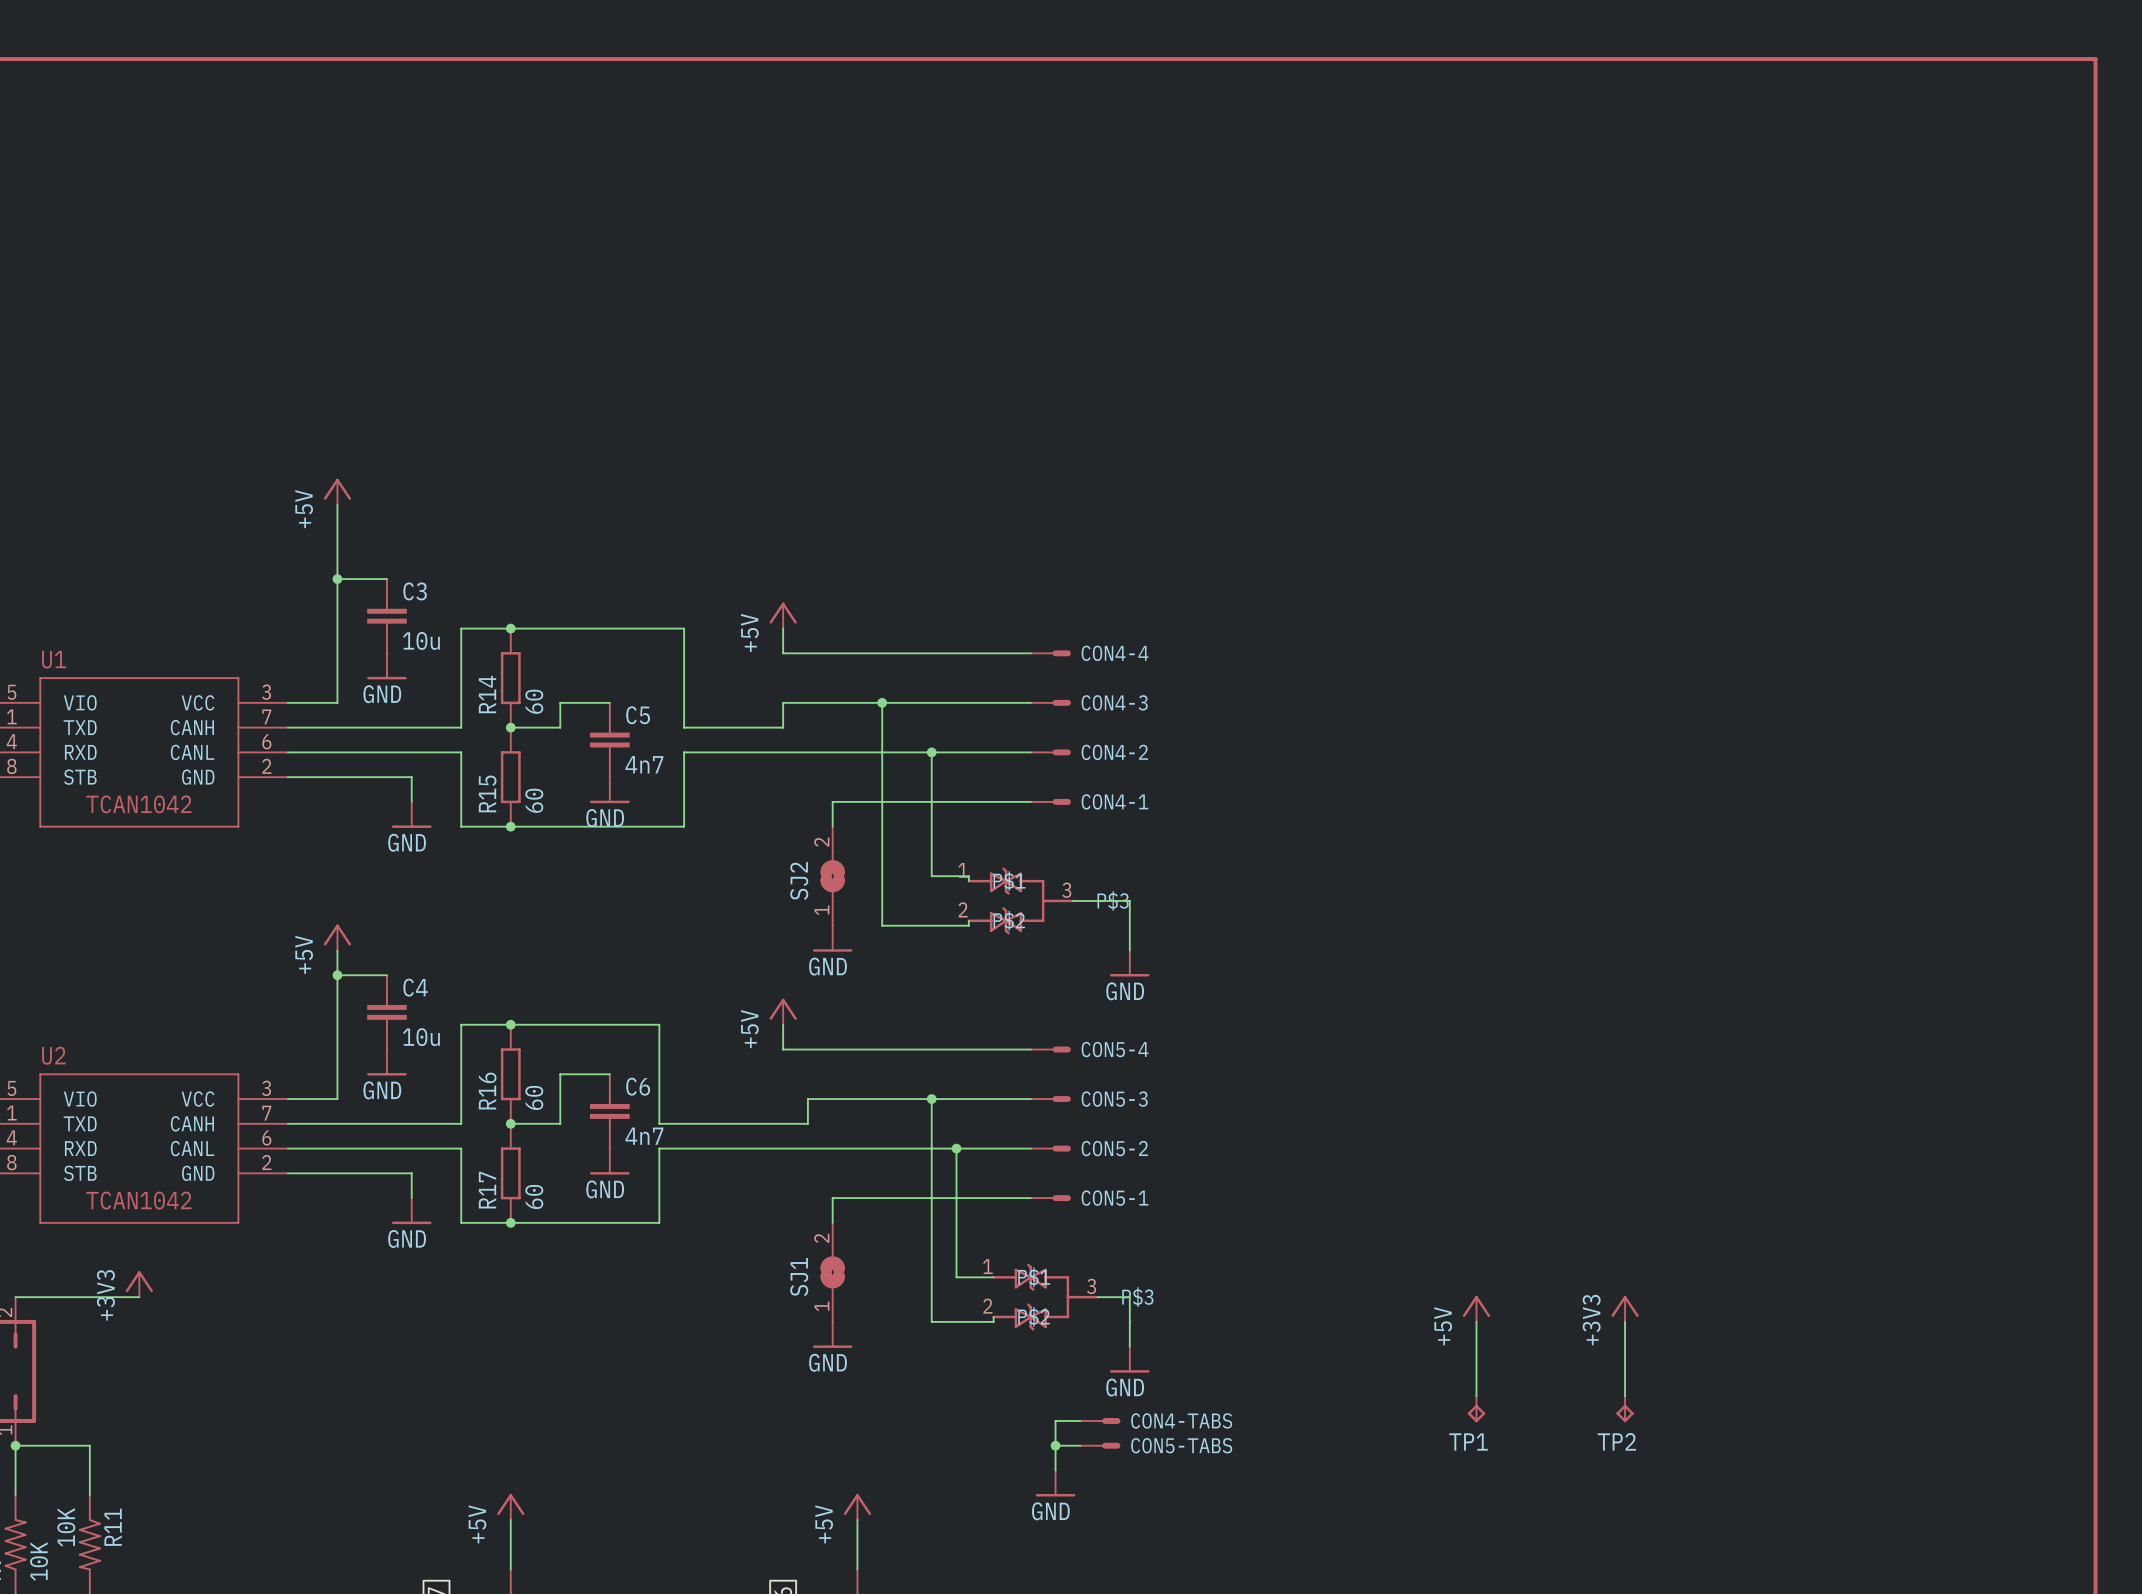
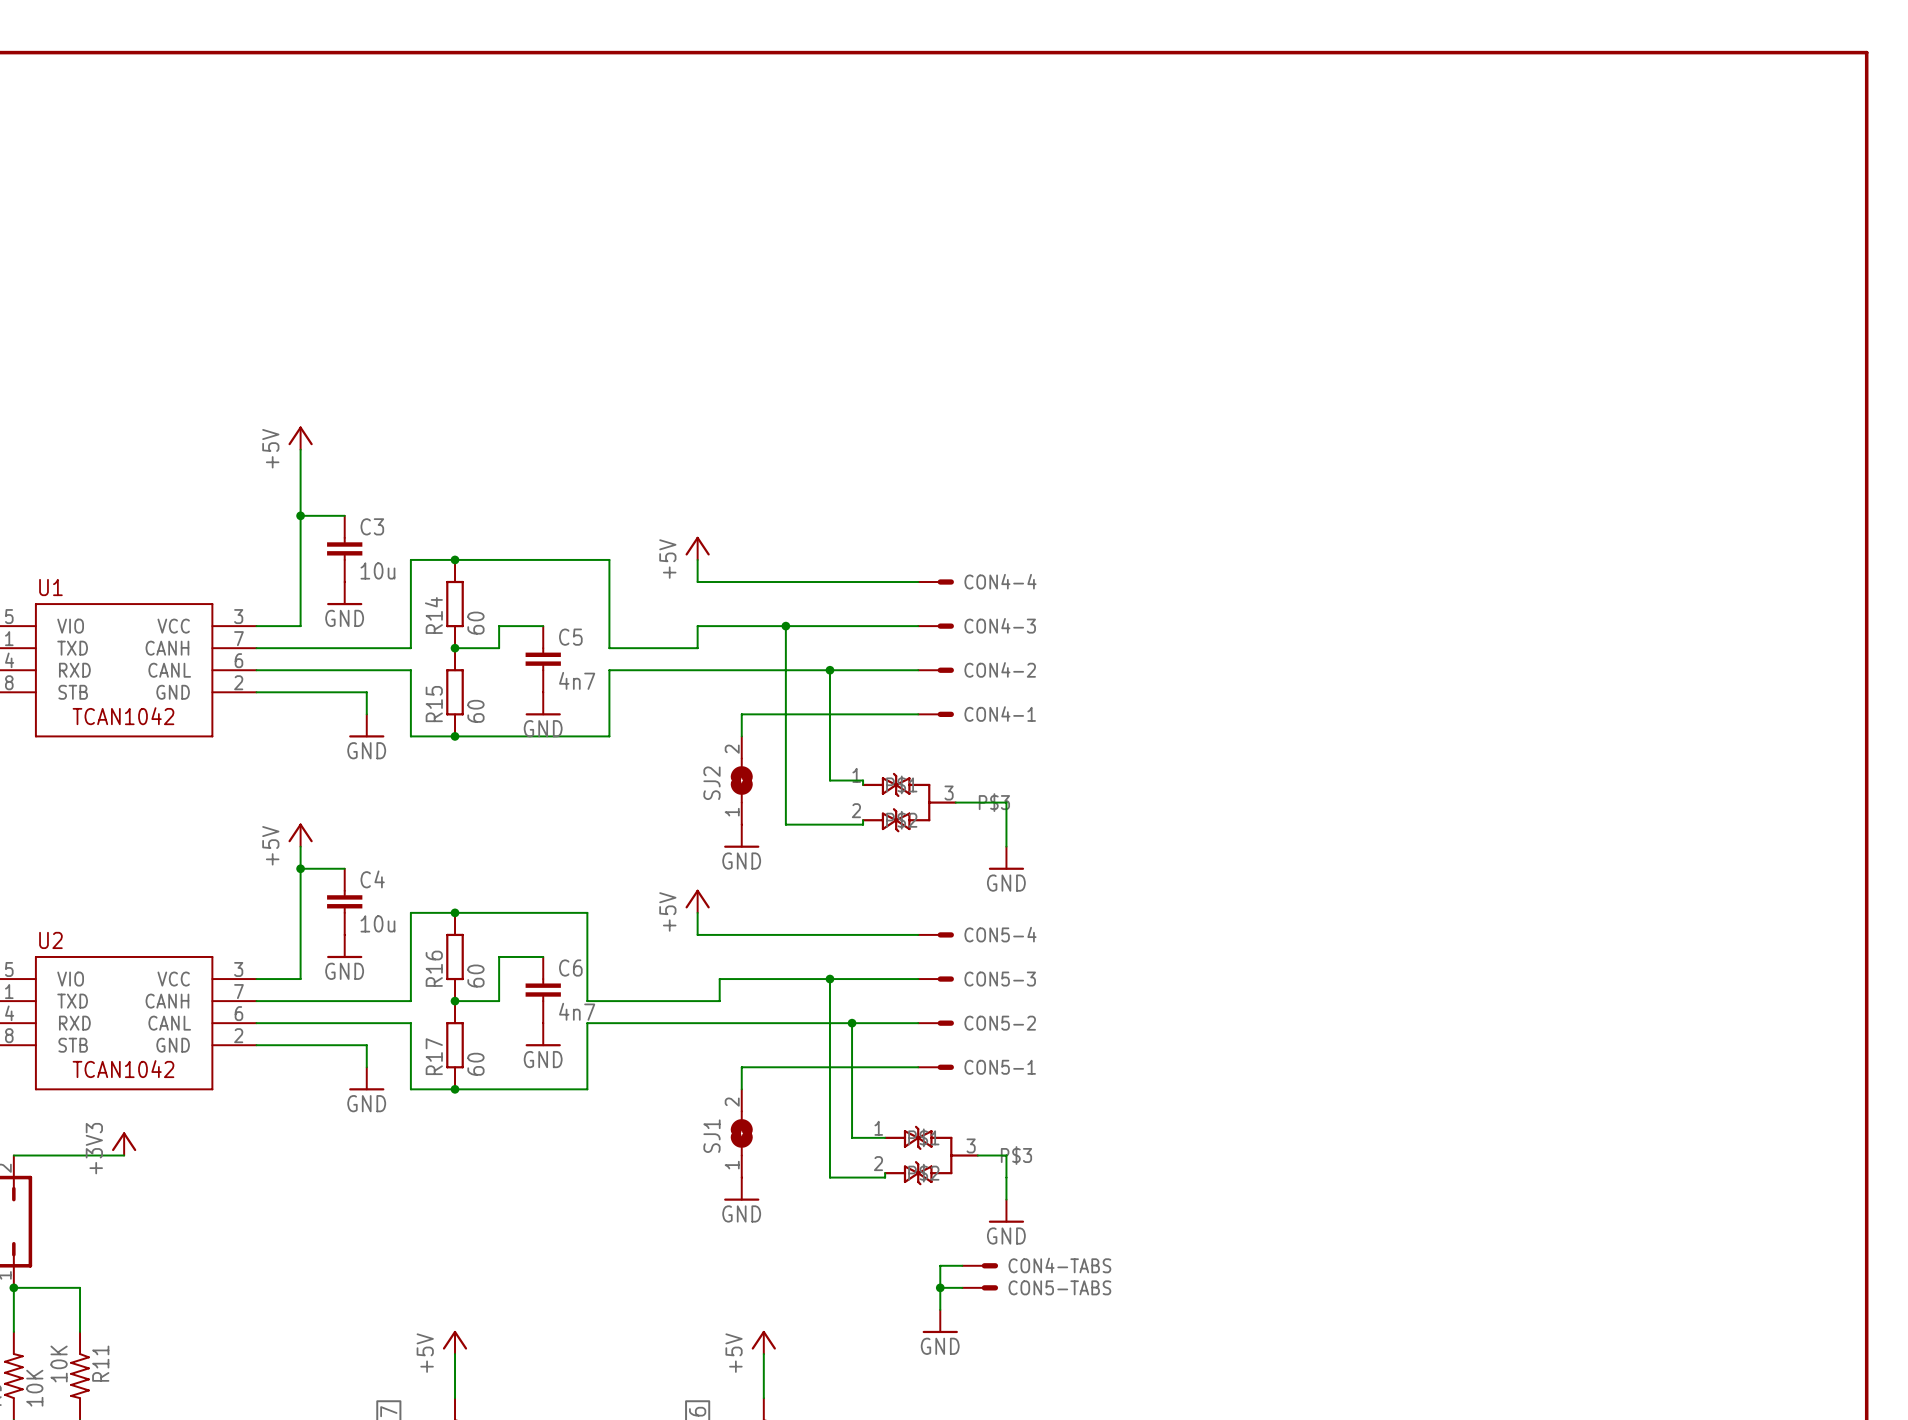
power symbol: +5V (1476, 1308) -> none
power symbol: +3V3 (1625, 1308) -> none
wire: (1476, 1321) (1476, 1396) -> none
wire: (1625, 1321) (1625, 1396) -> none
TP1: (1476, 1409) -> none
TP2: (1625, 1409) -> none

